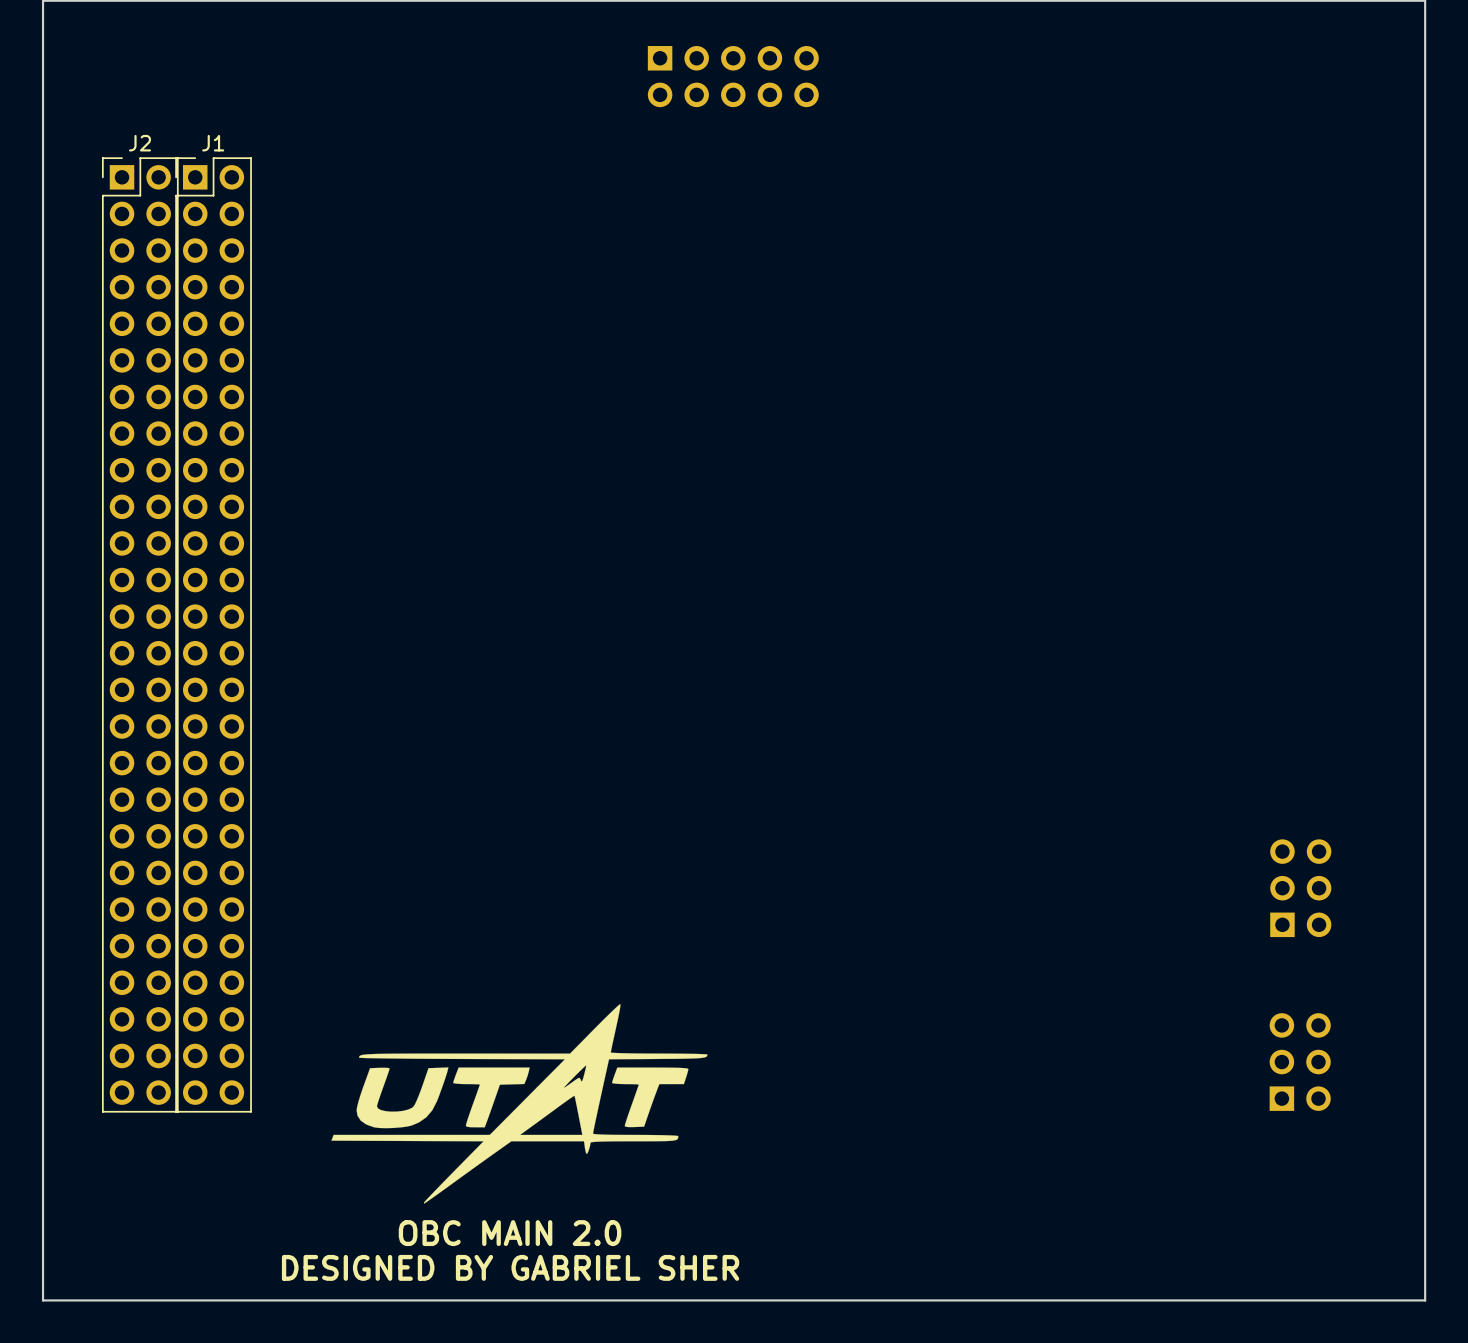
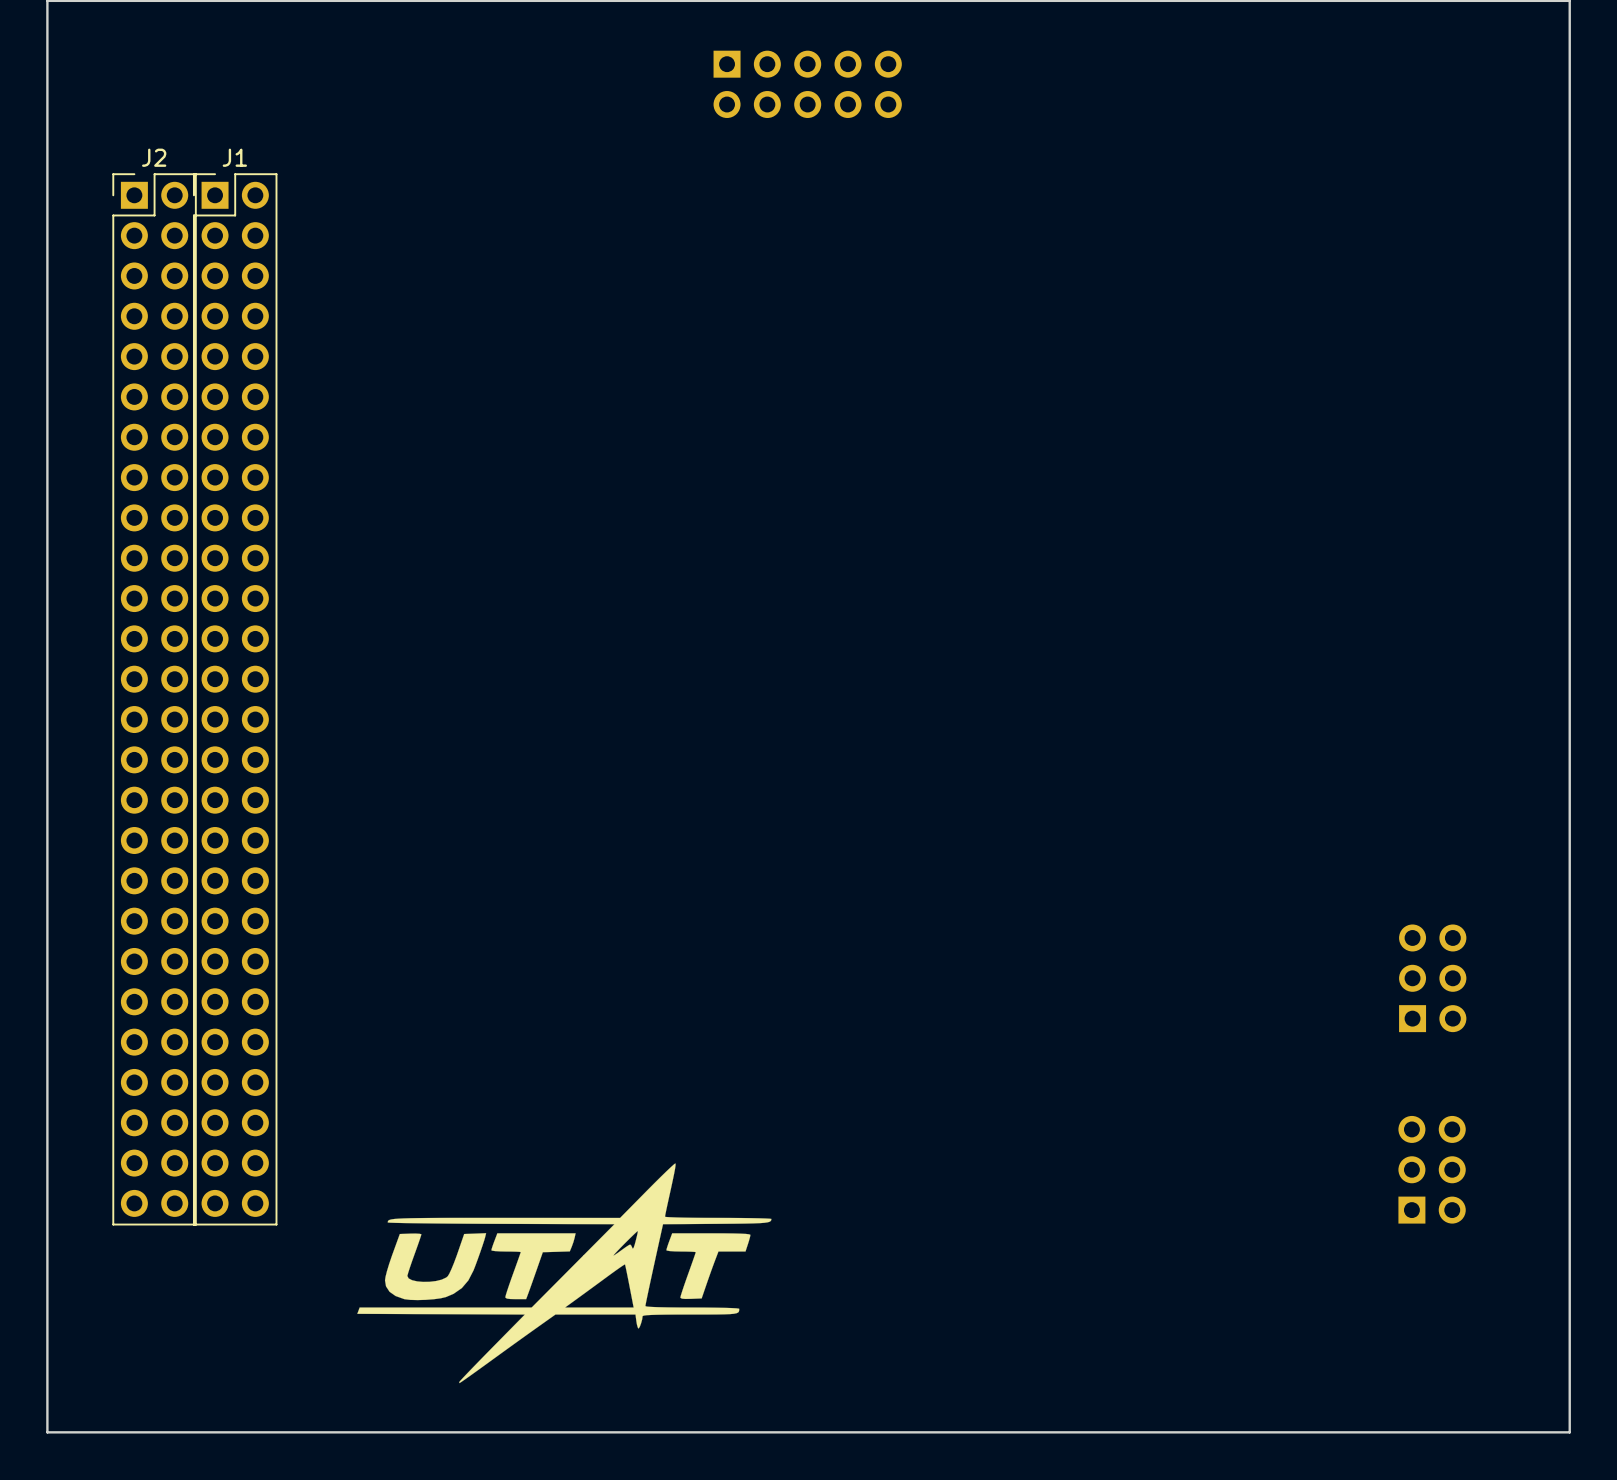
drawing position: (519, 1103) -> (564, 1273)
text: OBC MAIN 2.0 (510, 1233) -> none
text: DESIGNED BY GABRIEL SHER (510, 1267) -> none

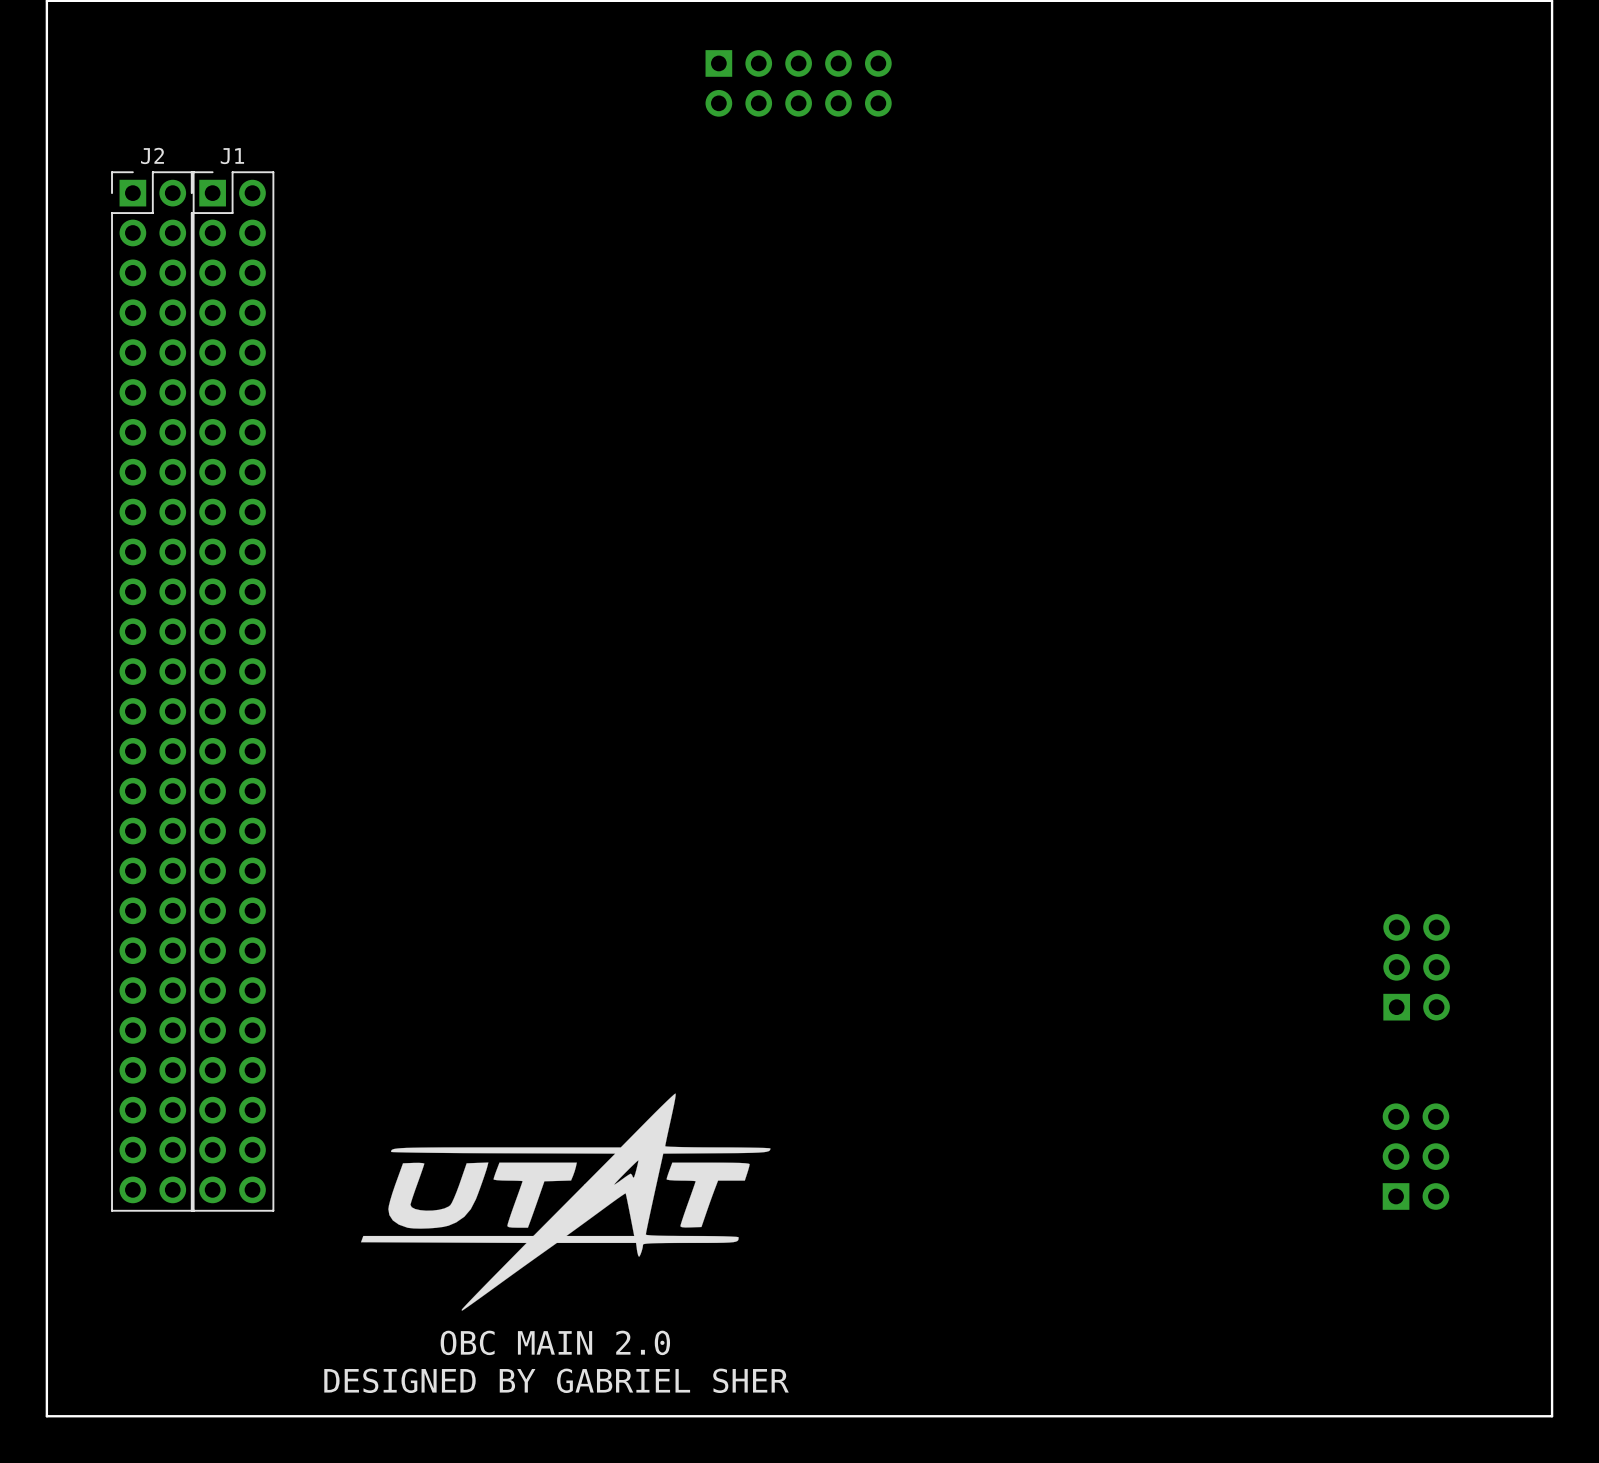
drawing position: (564, 1273) -> (565, 1202)
text: none -> OBC MAIN 2.0 (555, 1342)
text: none -> DESIGNED BY GABRIEL SHER (556, 1380)

